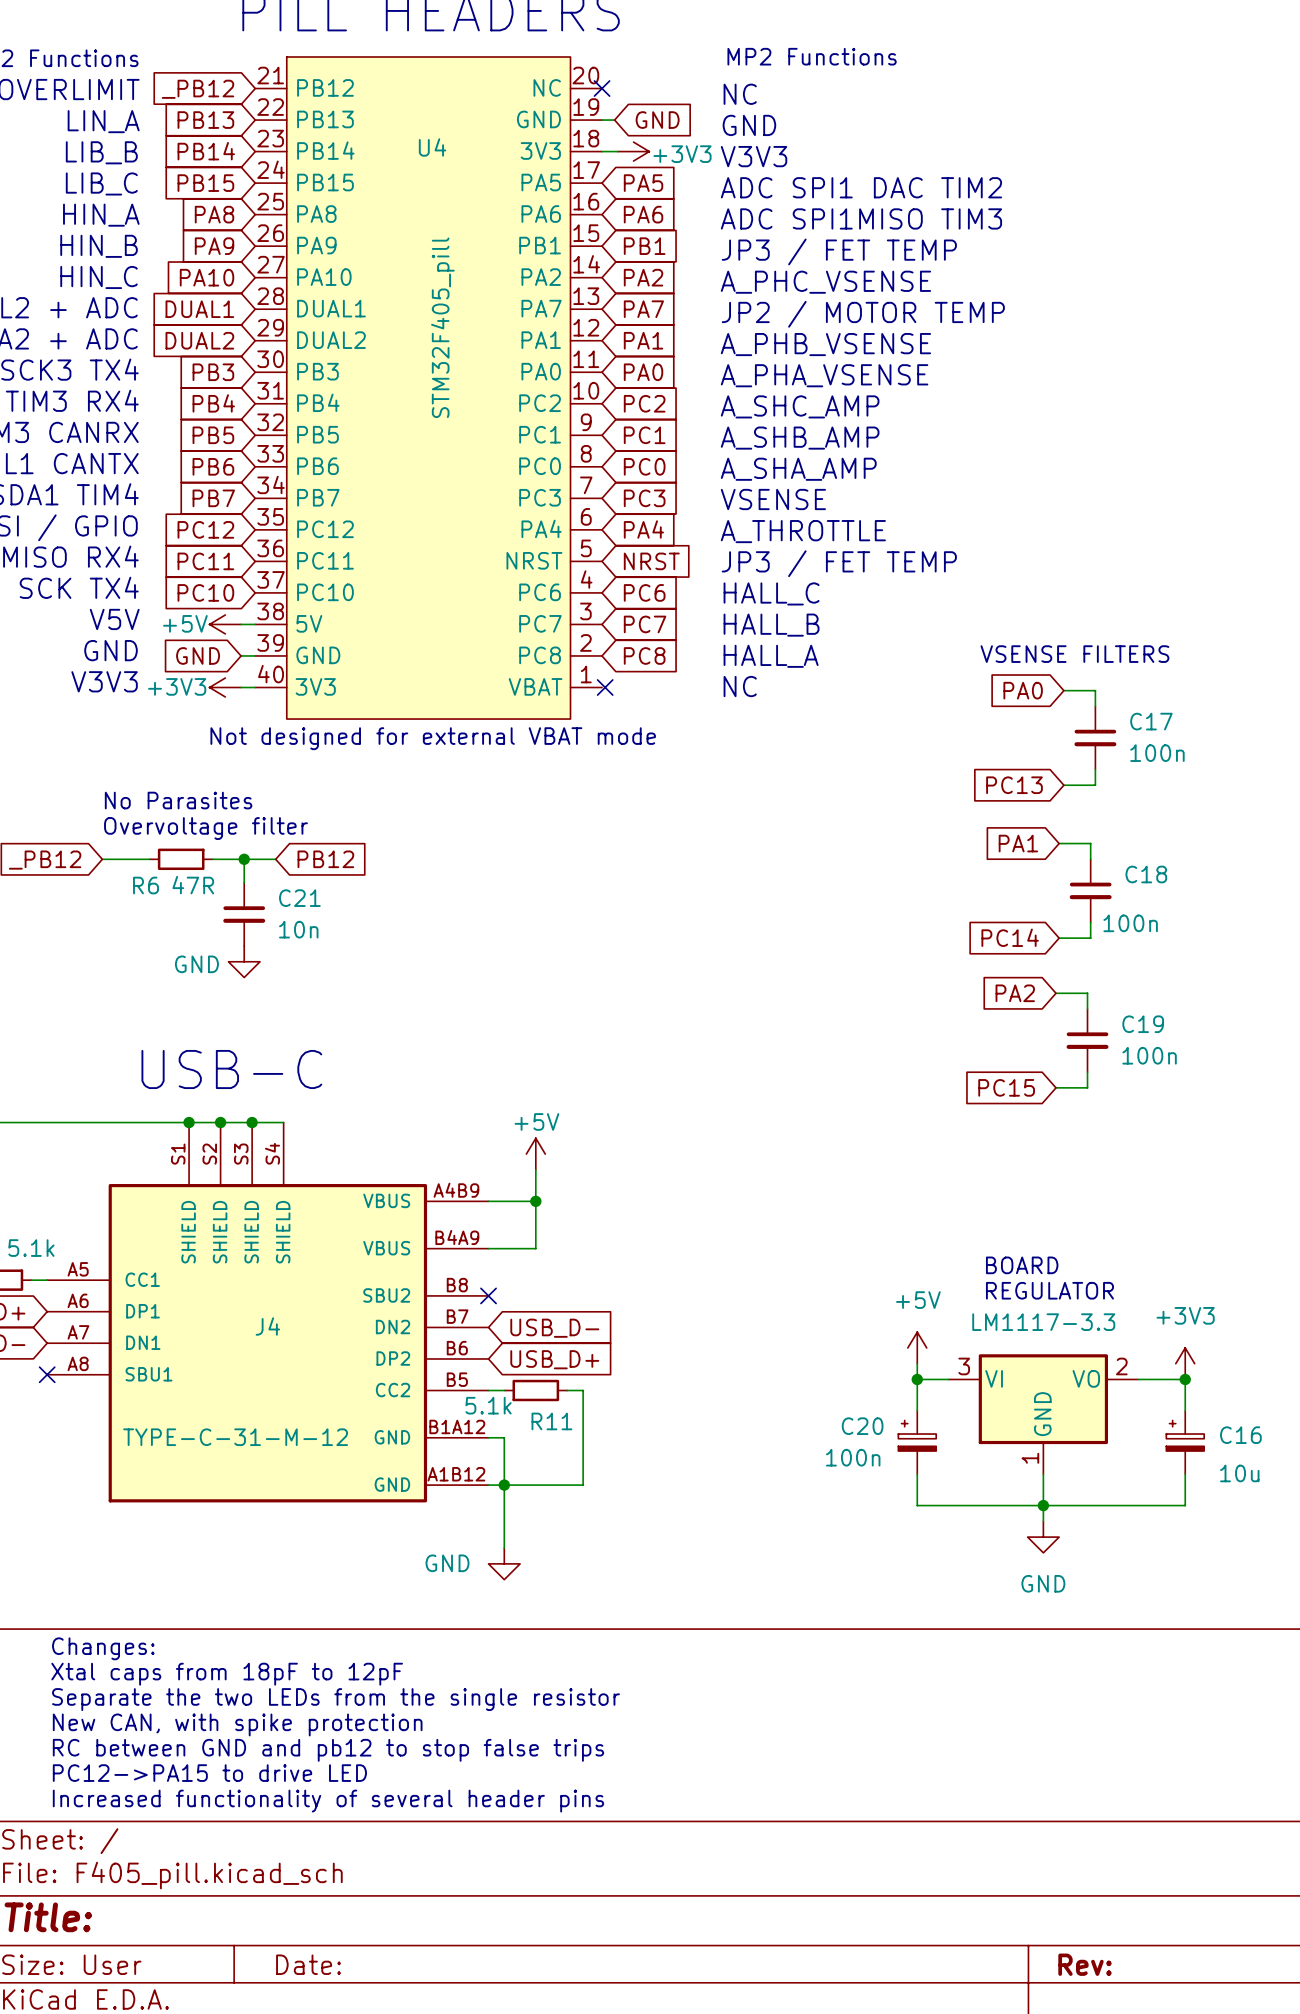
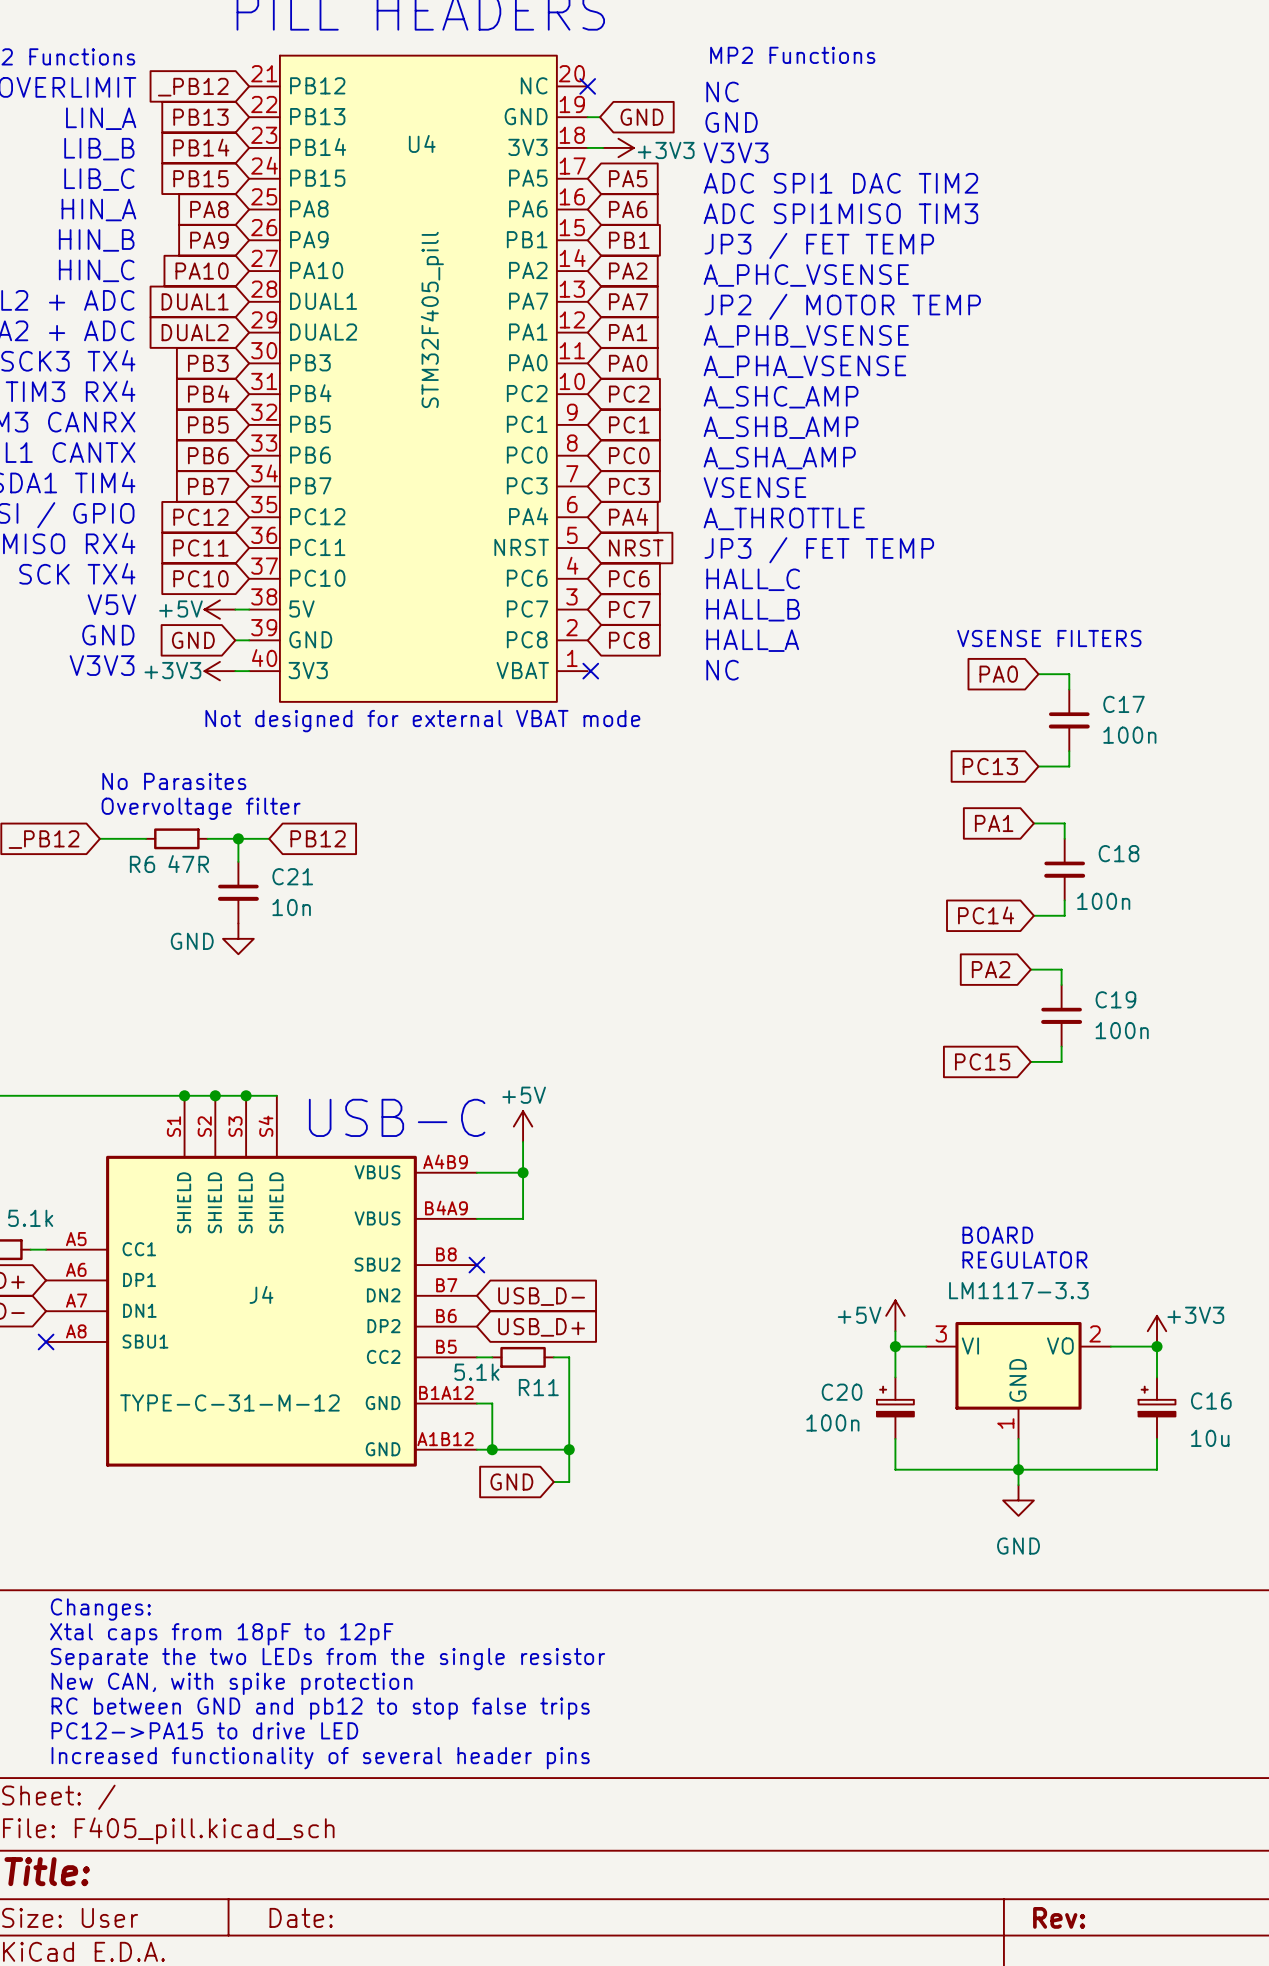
text position: USB-C (231, 1069) -> USB-C (397, 1117)
power symbol text position: +5V (918, 1300) -> +5V (859, 1315)
power symbol text position: +3V3 (1185, 1315) -> +3V3 (1195, 1315)
wire: (504, 1485) (504, 1548) -> none
wire: none -> (569, 1449) (569, 1482) (553, 1482)
junction: none -> (569, 1449)
global label: none -> GND (511, 1482)
power symbol: GND (504, 1563) -> none

